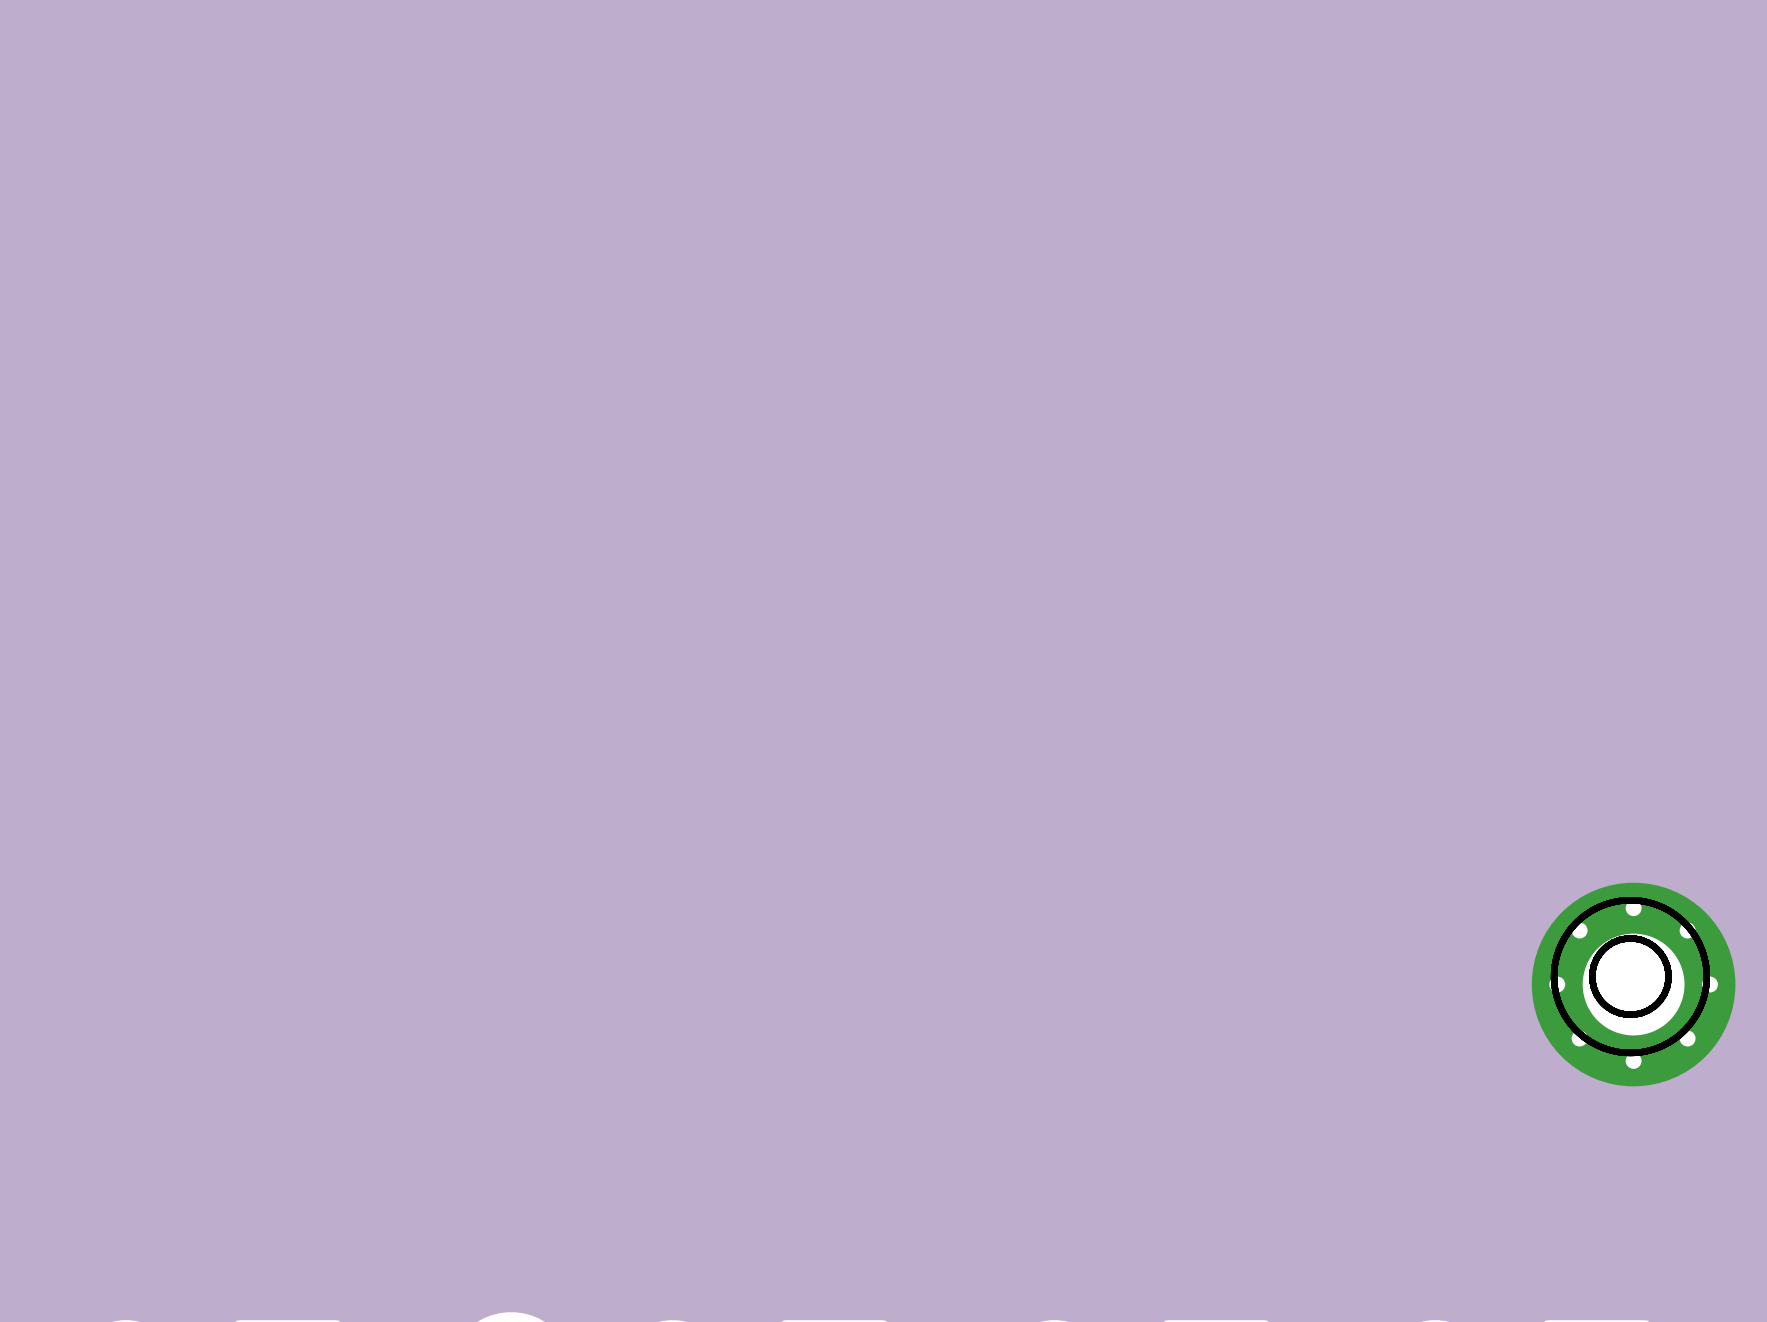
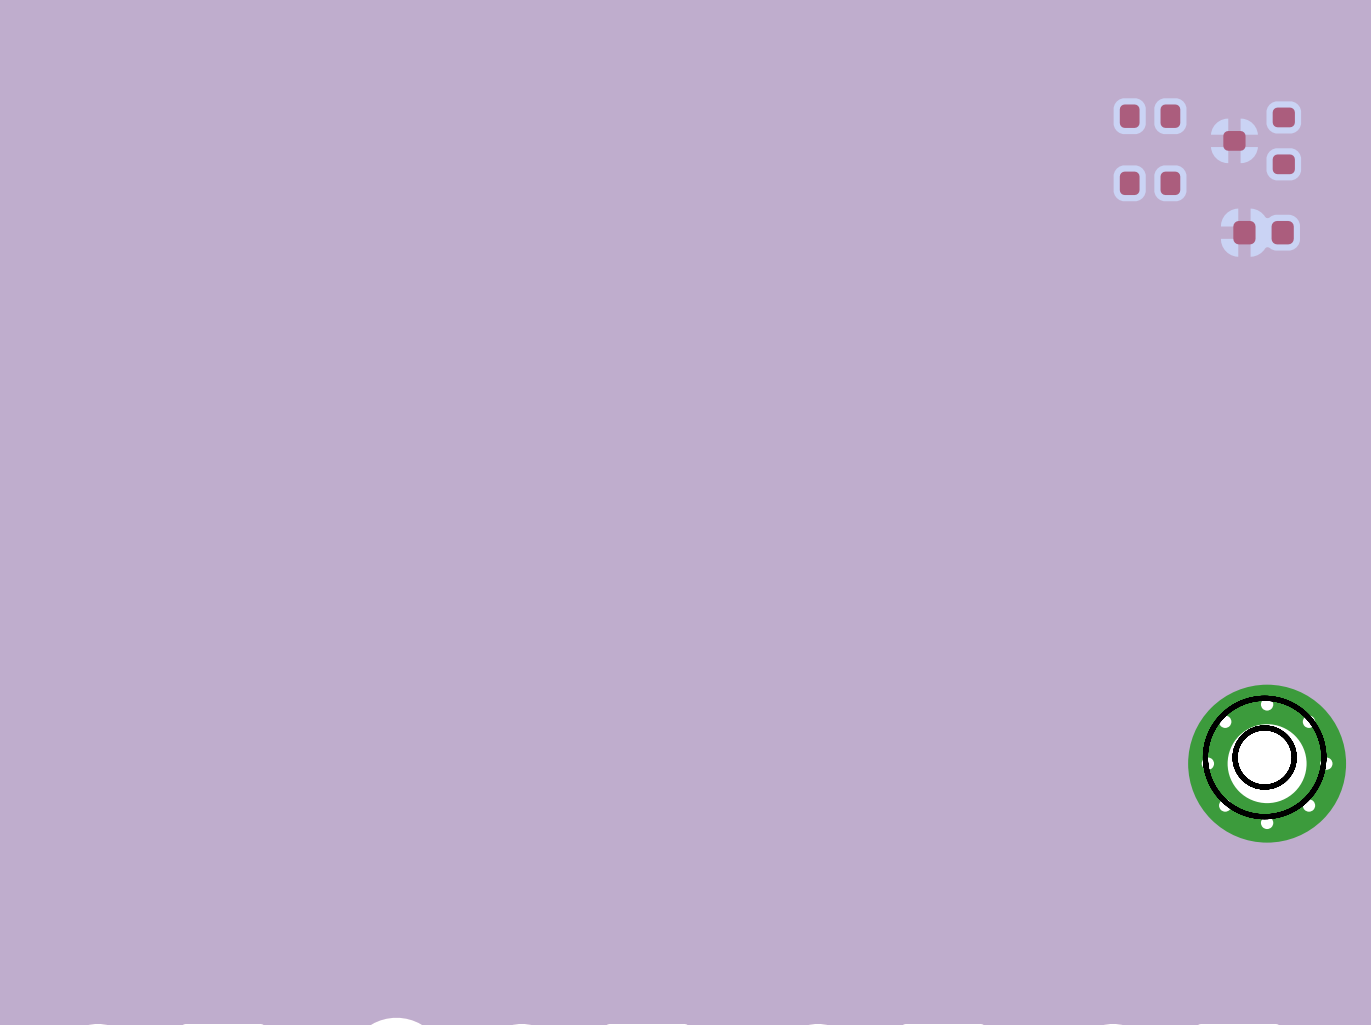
part: none -> (1150, 116)
part: none -> (1259, 140)
part: none -> (1150, 183)
part: none -> (1263, 232)

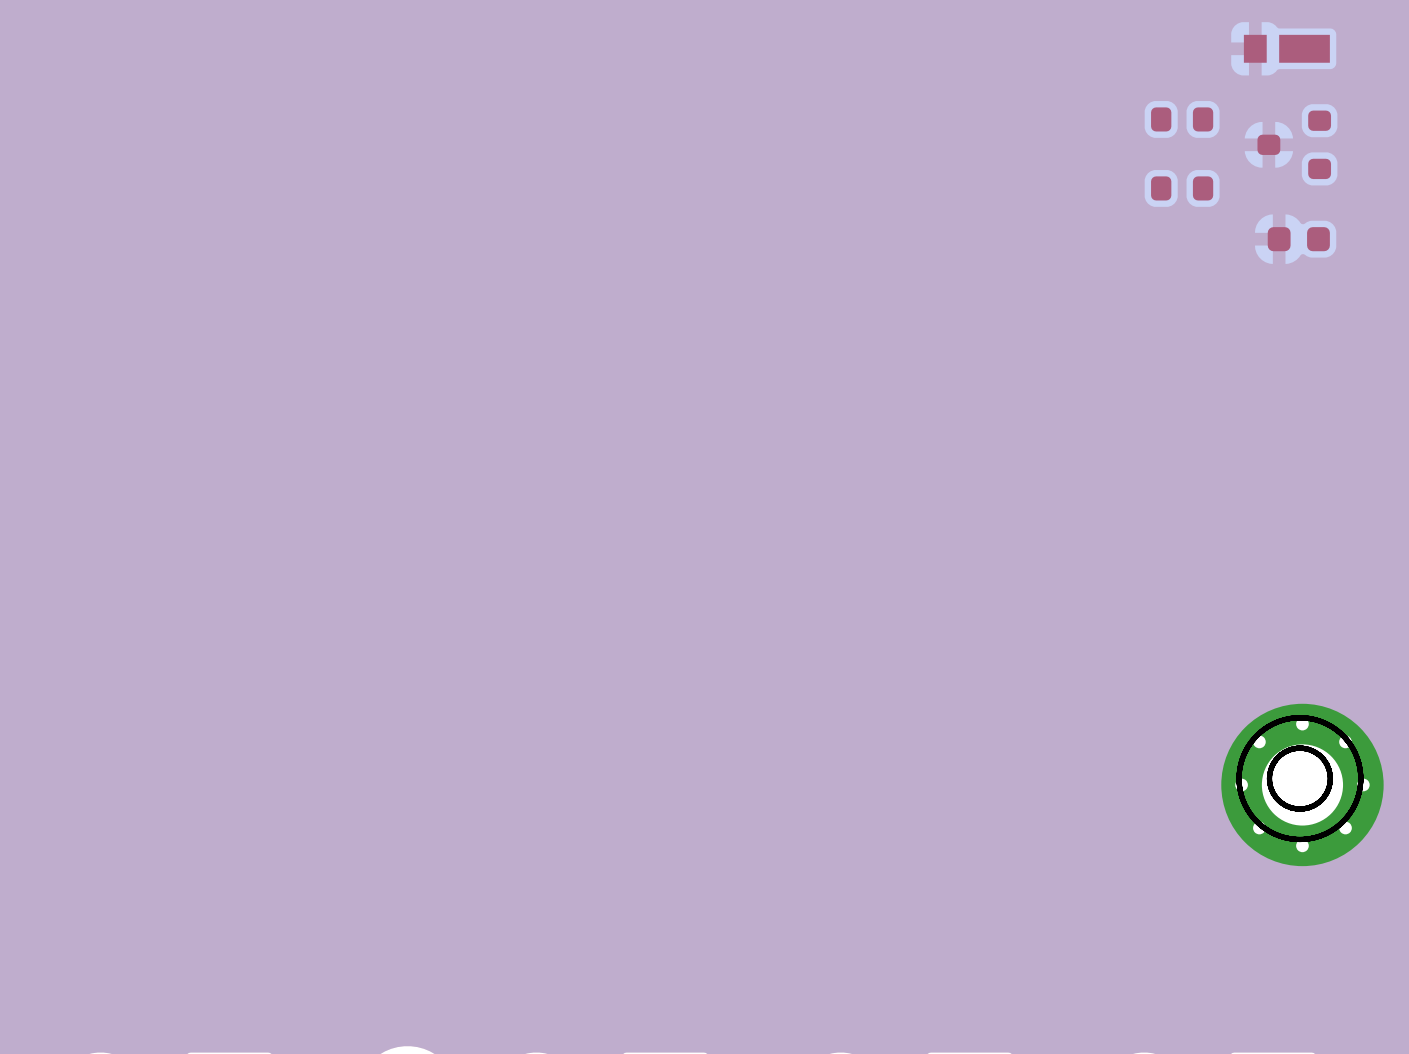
part: none -> (1286, 48)

